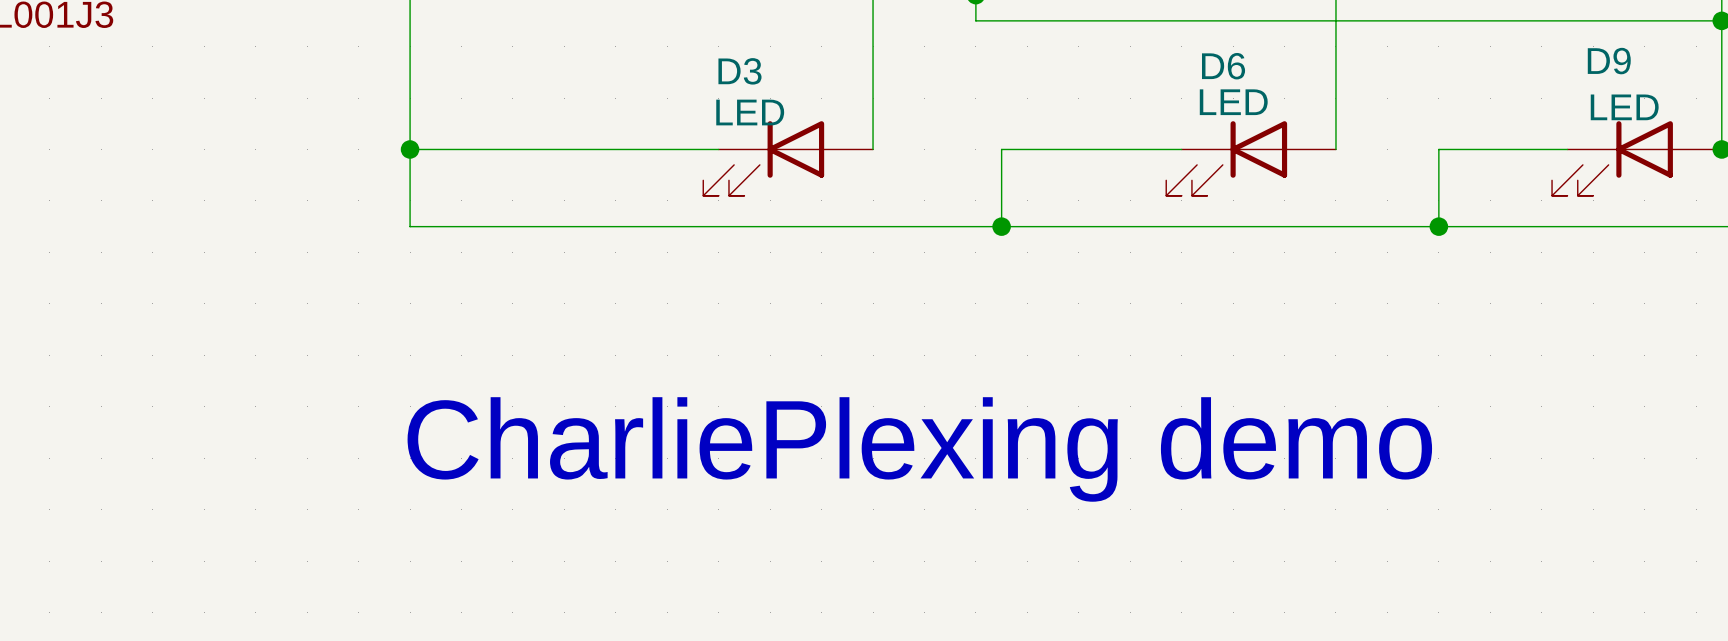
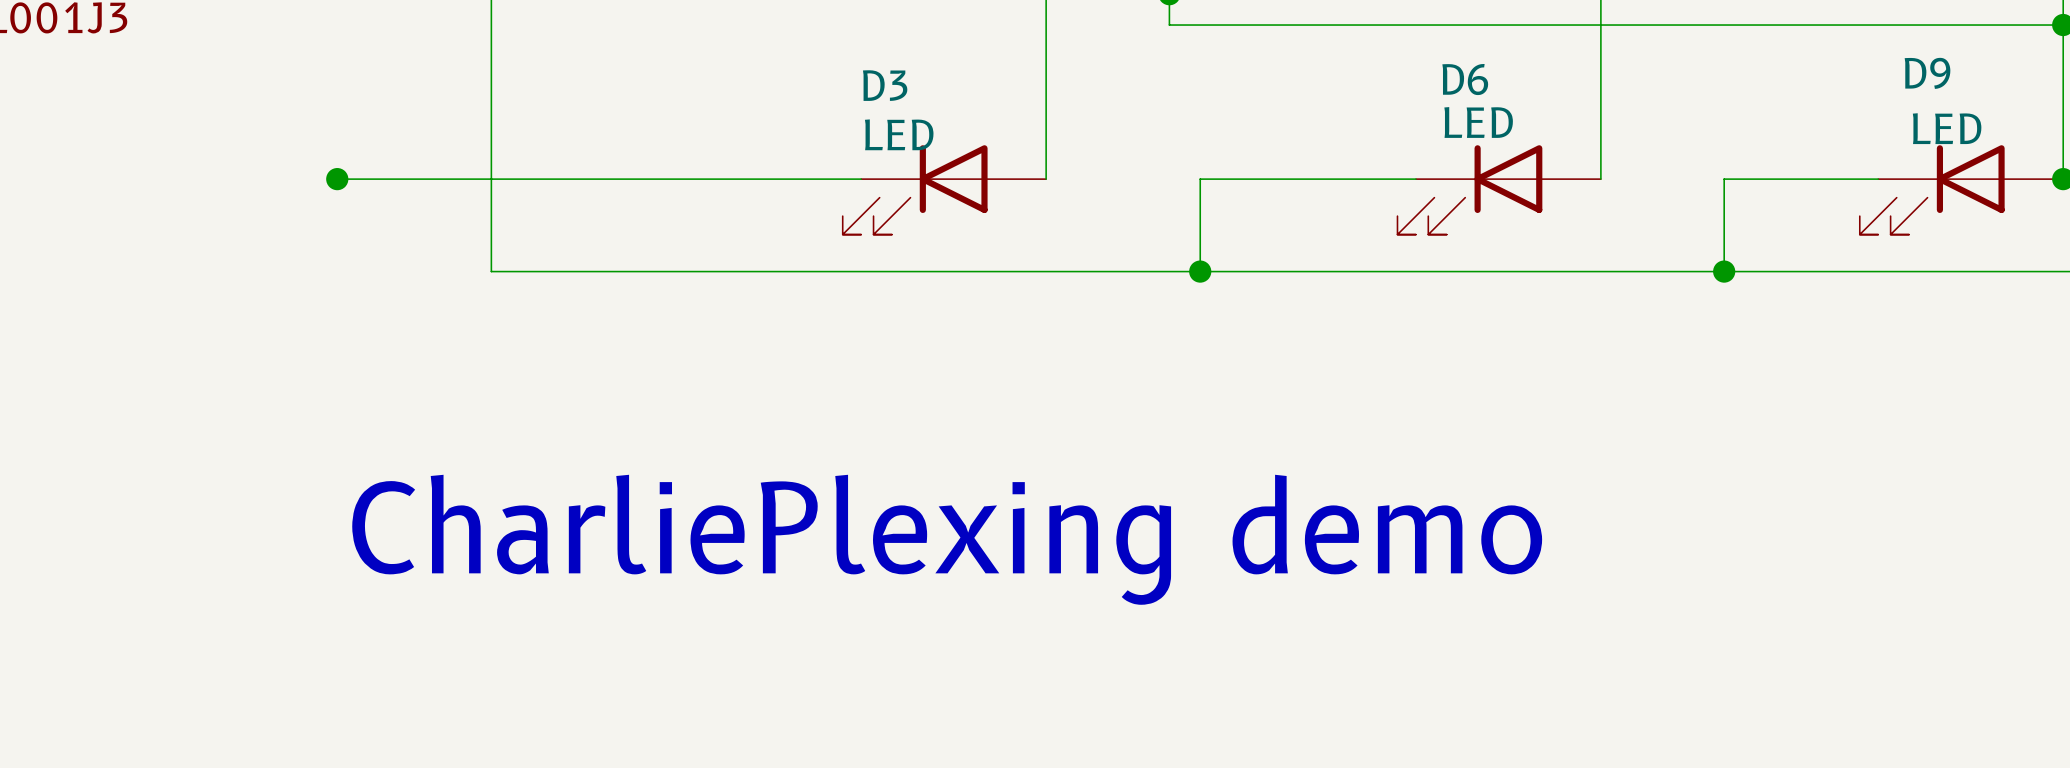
wire: none -> (337, 179) (491, 179)
junction: none -> (337, 179)
junction: (410, 149) -> none
text position: CharliePlexing demo (919, 449) -> CharliePlexing demo (947, 539)

